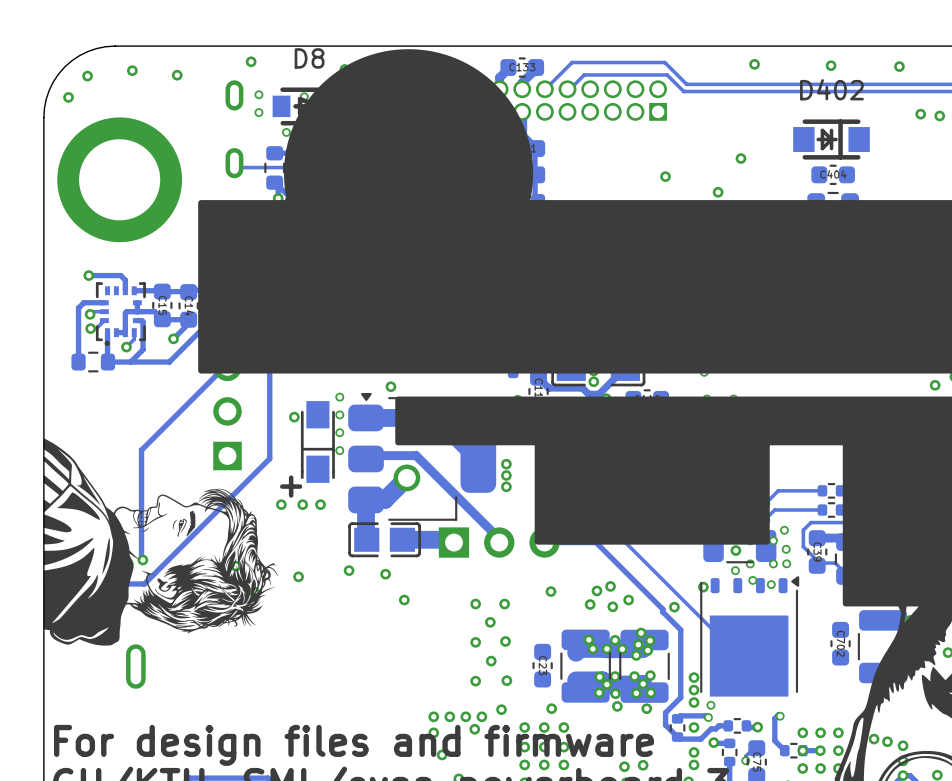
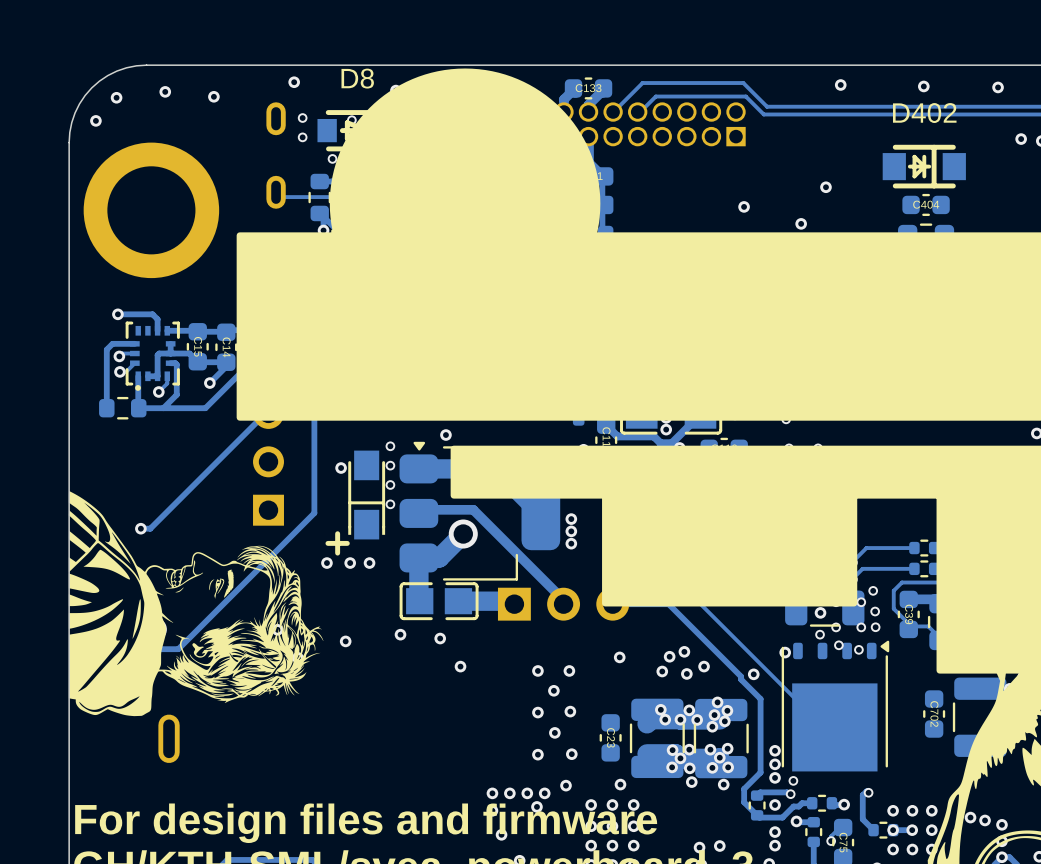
track: (141, 450) (142, 560) -> (175, 503) (150, 528) (140, 528)
via position: (142, 560) -> (140, 528)

